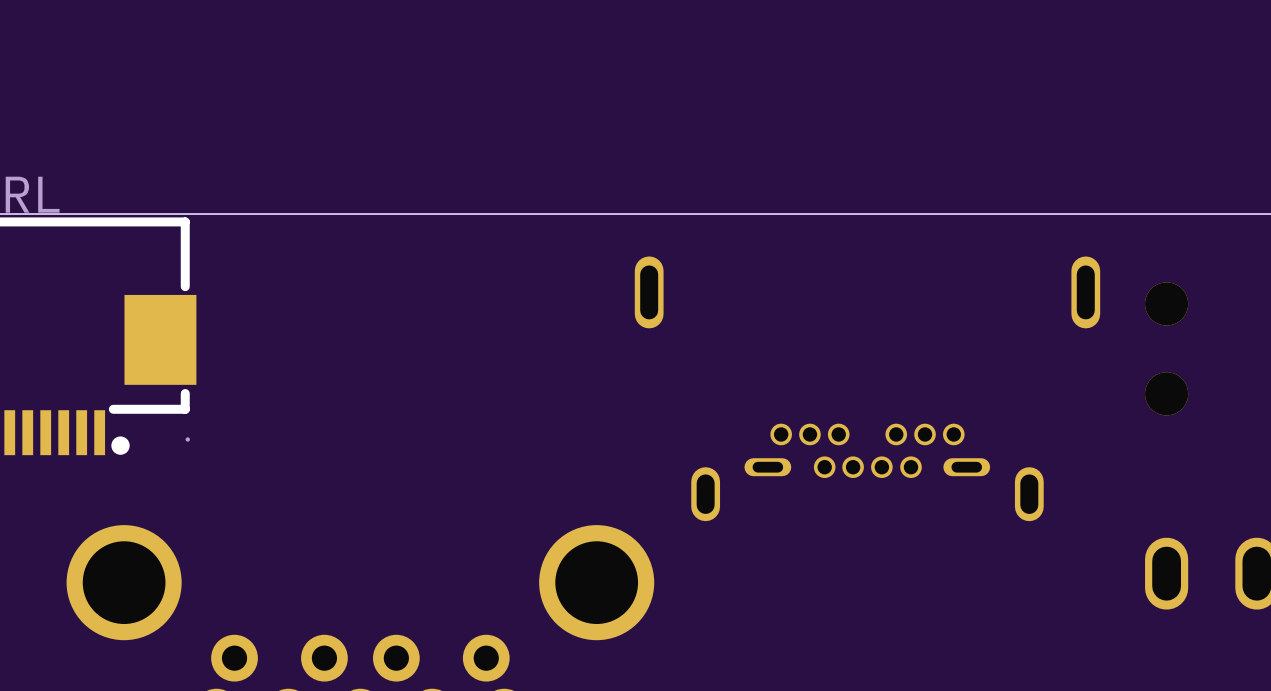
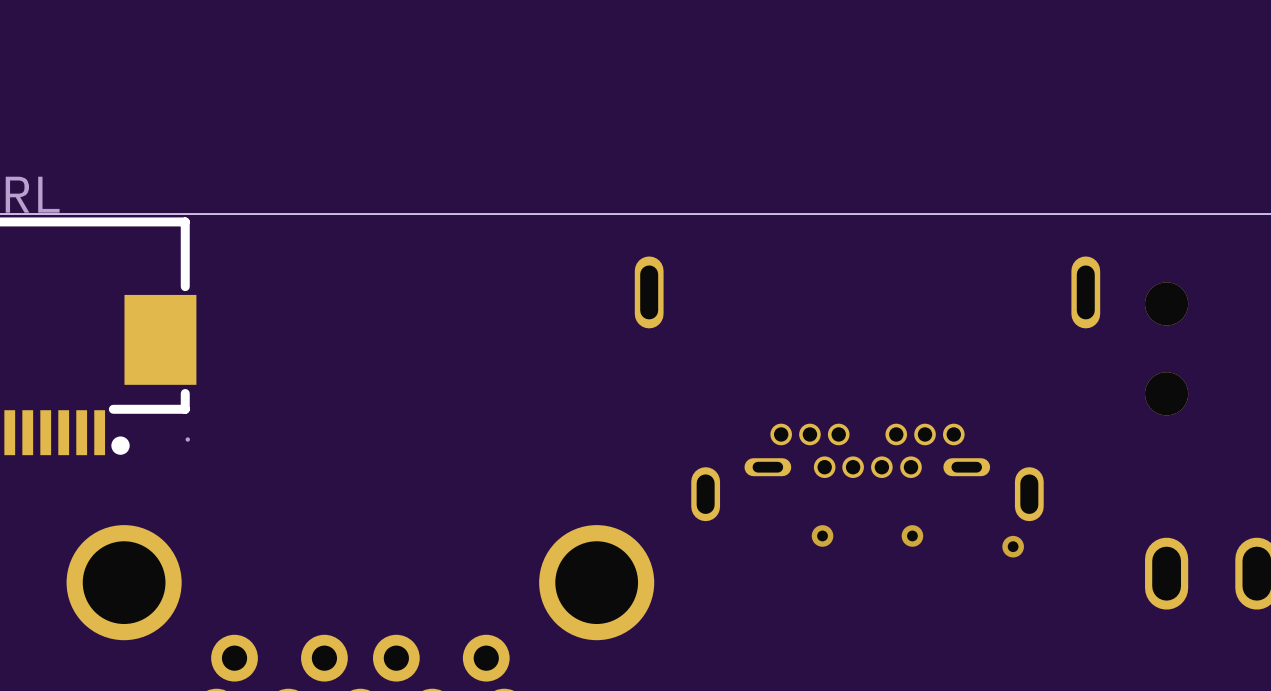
via: none -> (822, 535)
via: none -> (912, 535)
via: none -> (1013, 546)

